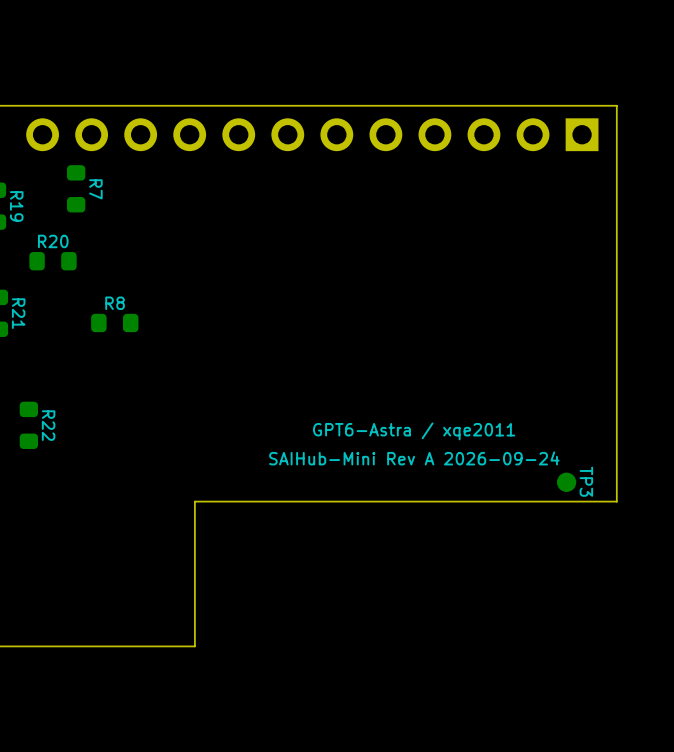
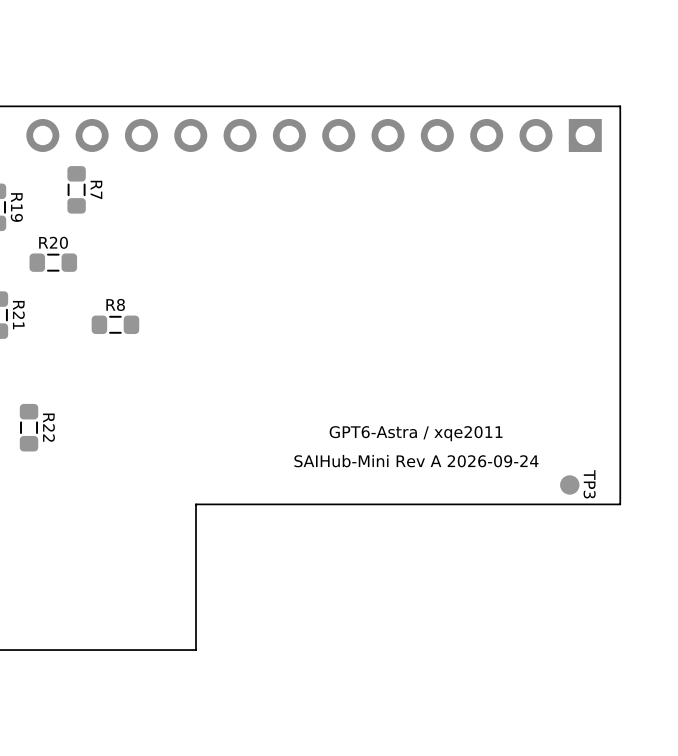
line: none -> (68, 184) (68, 195)
line: none -> (84, 184) (84, 195)
line: none -> (4, 201) (4, 212)
line: none -> (58, 254) (47, 254)
line: none -> (58, 270) (47, 270)
line: none -> (6, 309) (6, 320)
line: none -> (120, 316) (110, 316)
line: none -> (120, 332) (110, 332)
line: none -> (21, 422) (21, 433)
line: none -> (37, 422) (37, 433)

